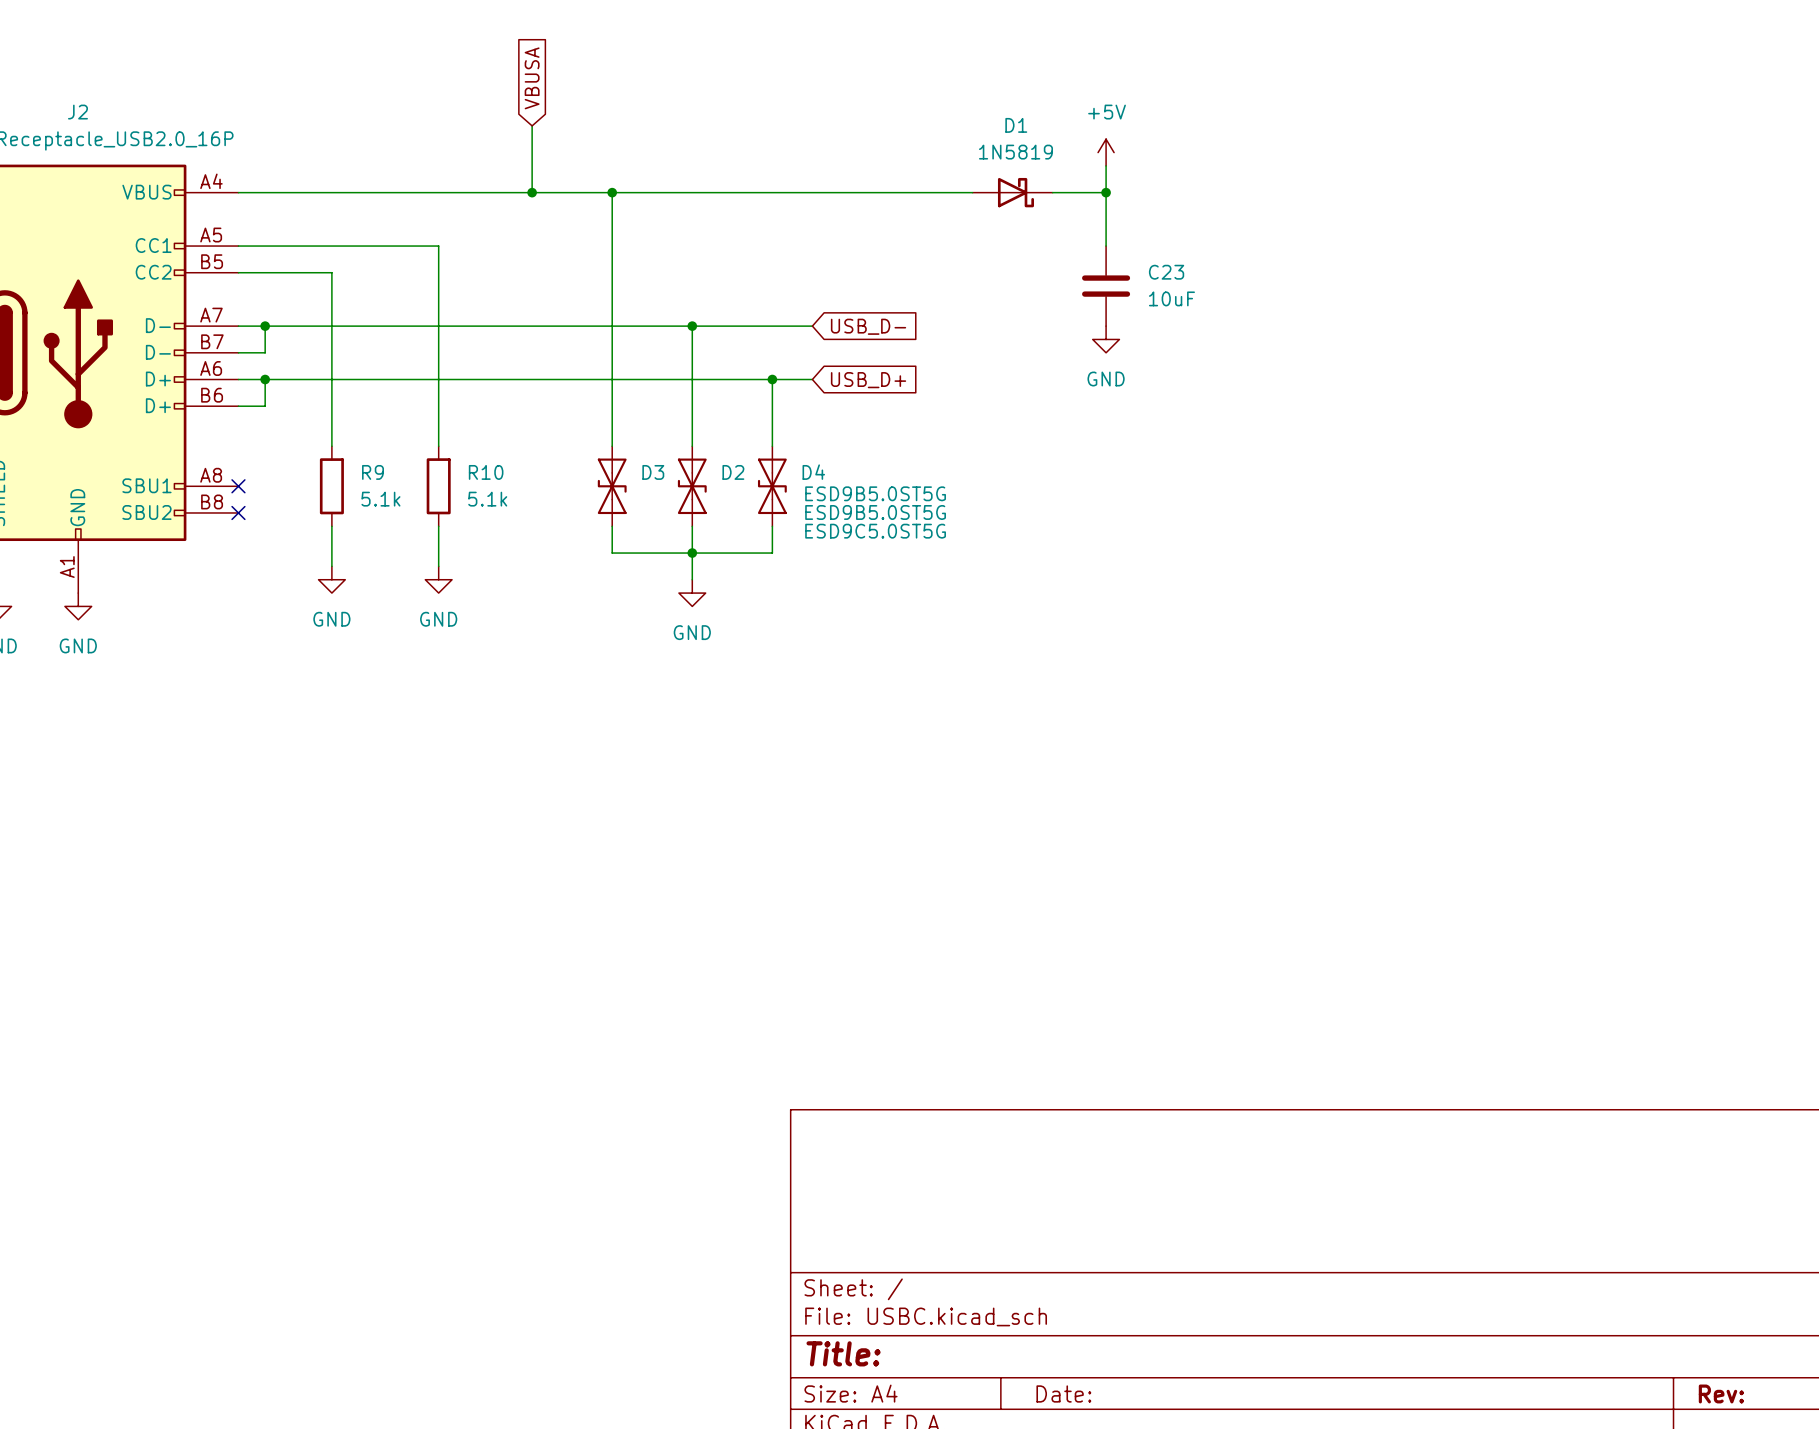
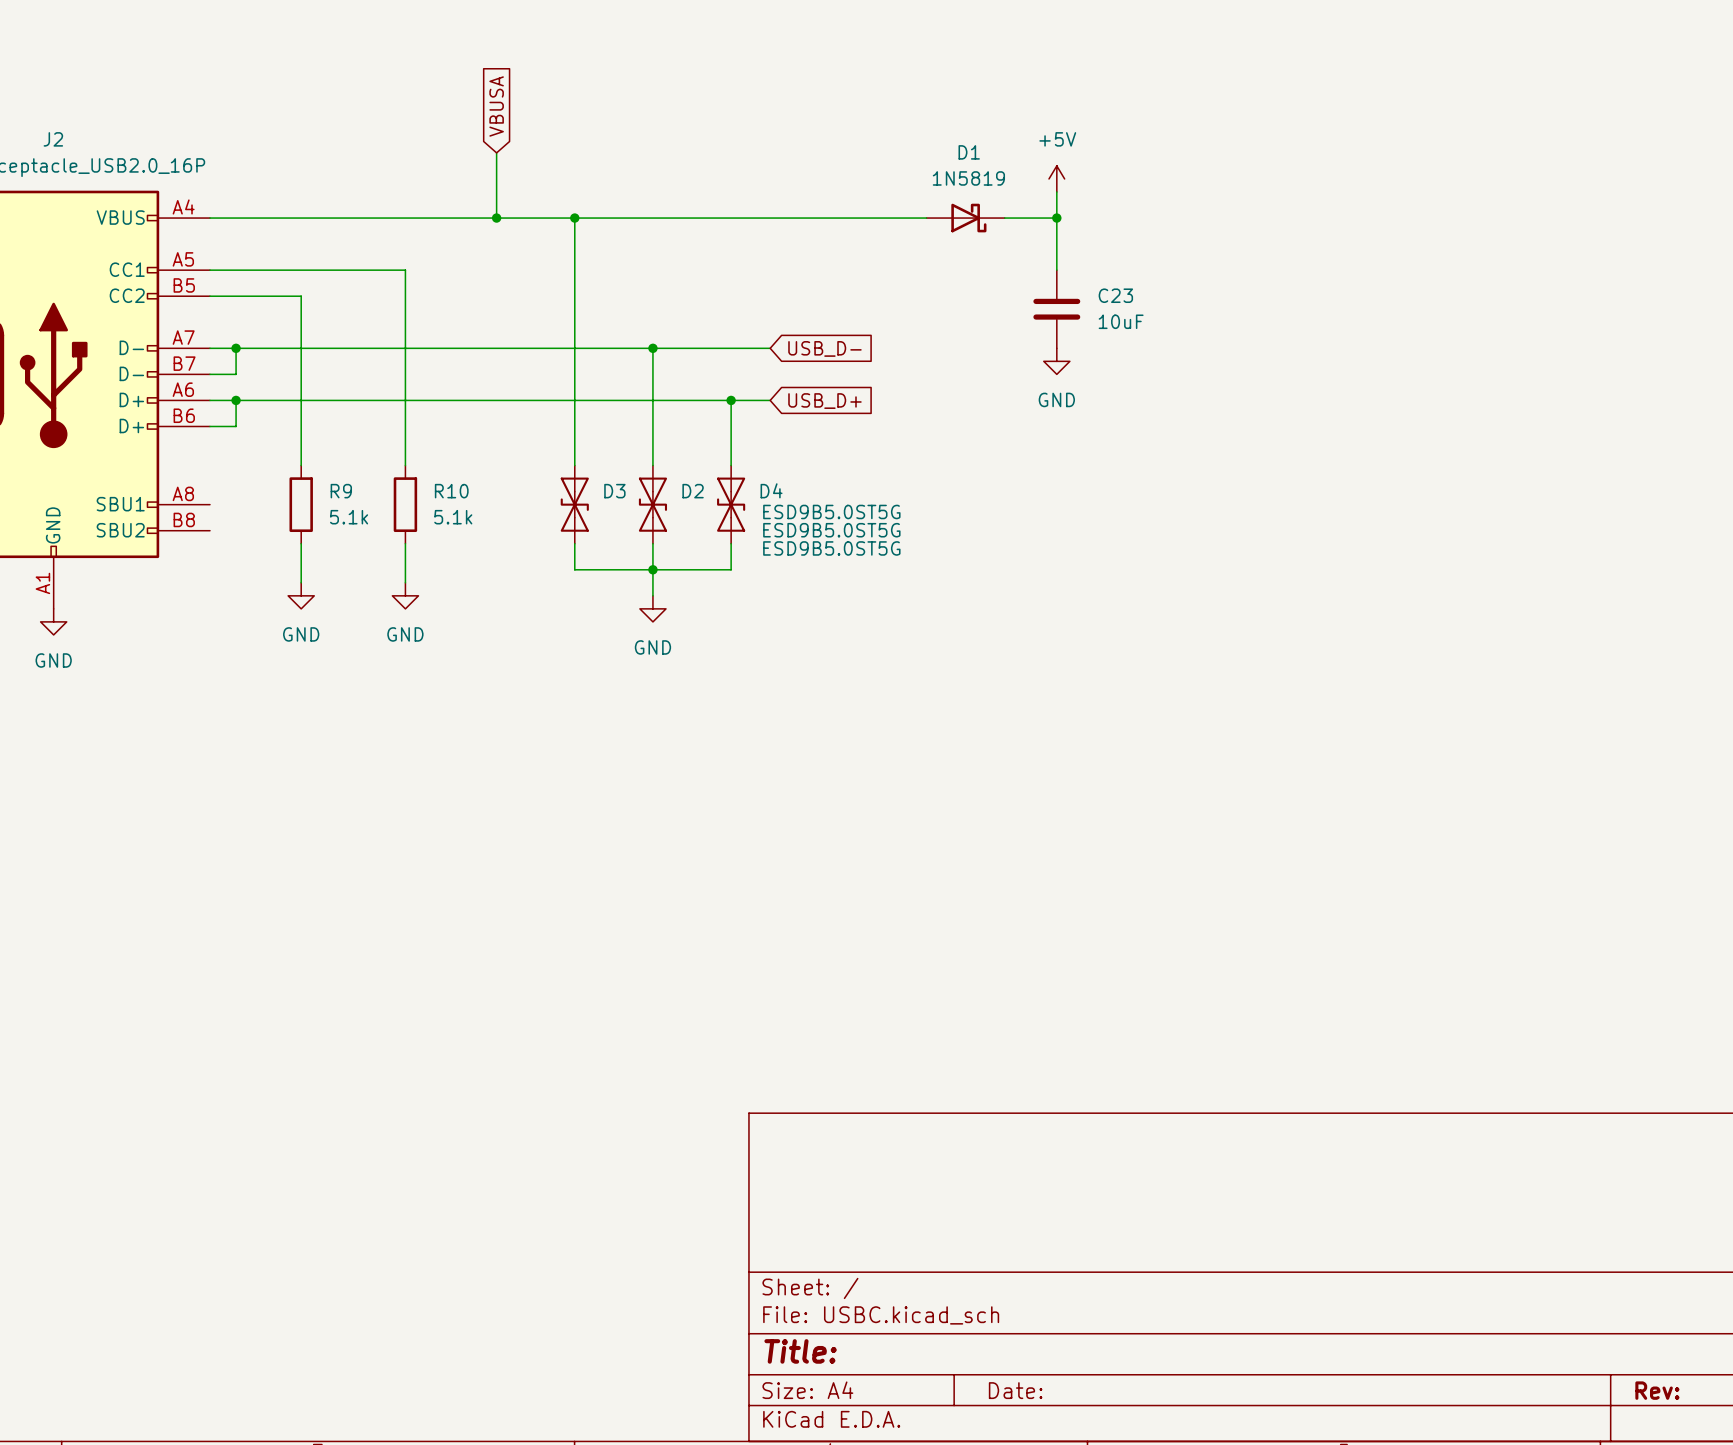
no-connect mark: (238, 486) -> none
no-connect mark: (238, 512) -> none
D4 value: ESD9C5.0ST5G (875, 531) -> ESD9B5.0ST5G (831, 548)

